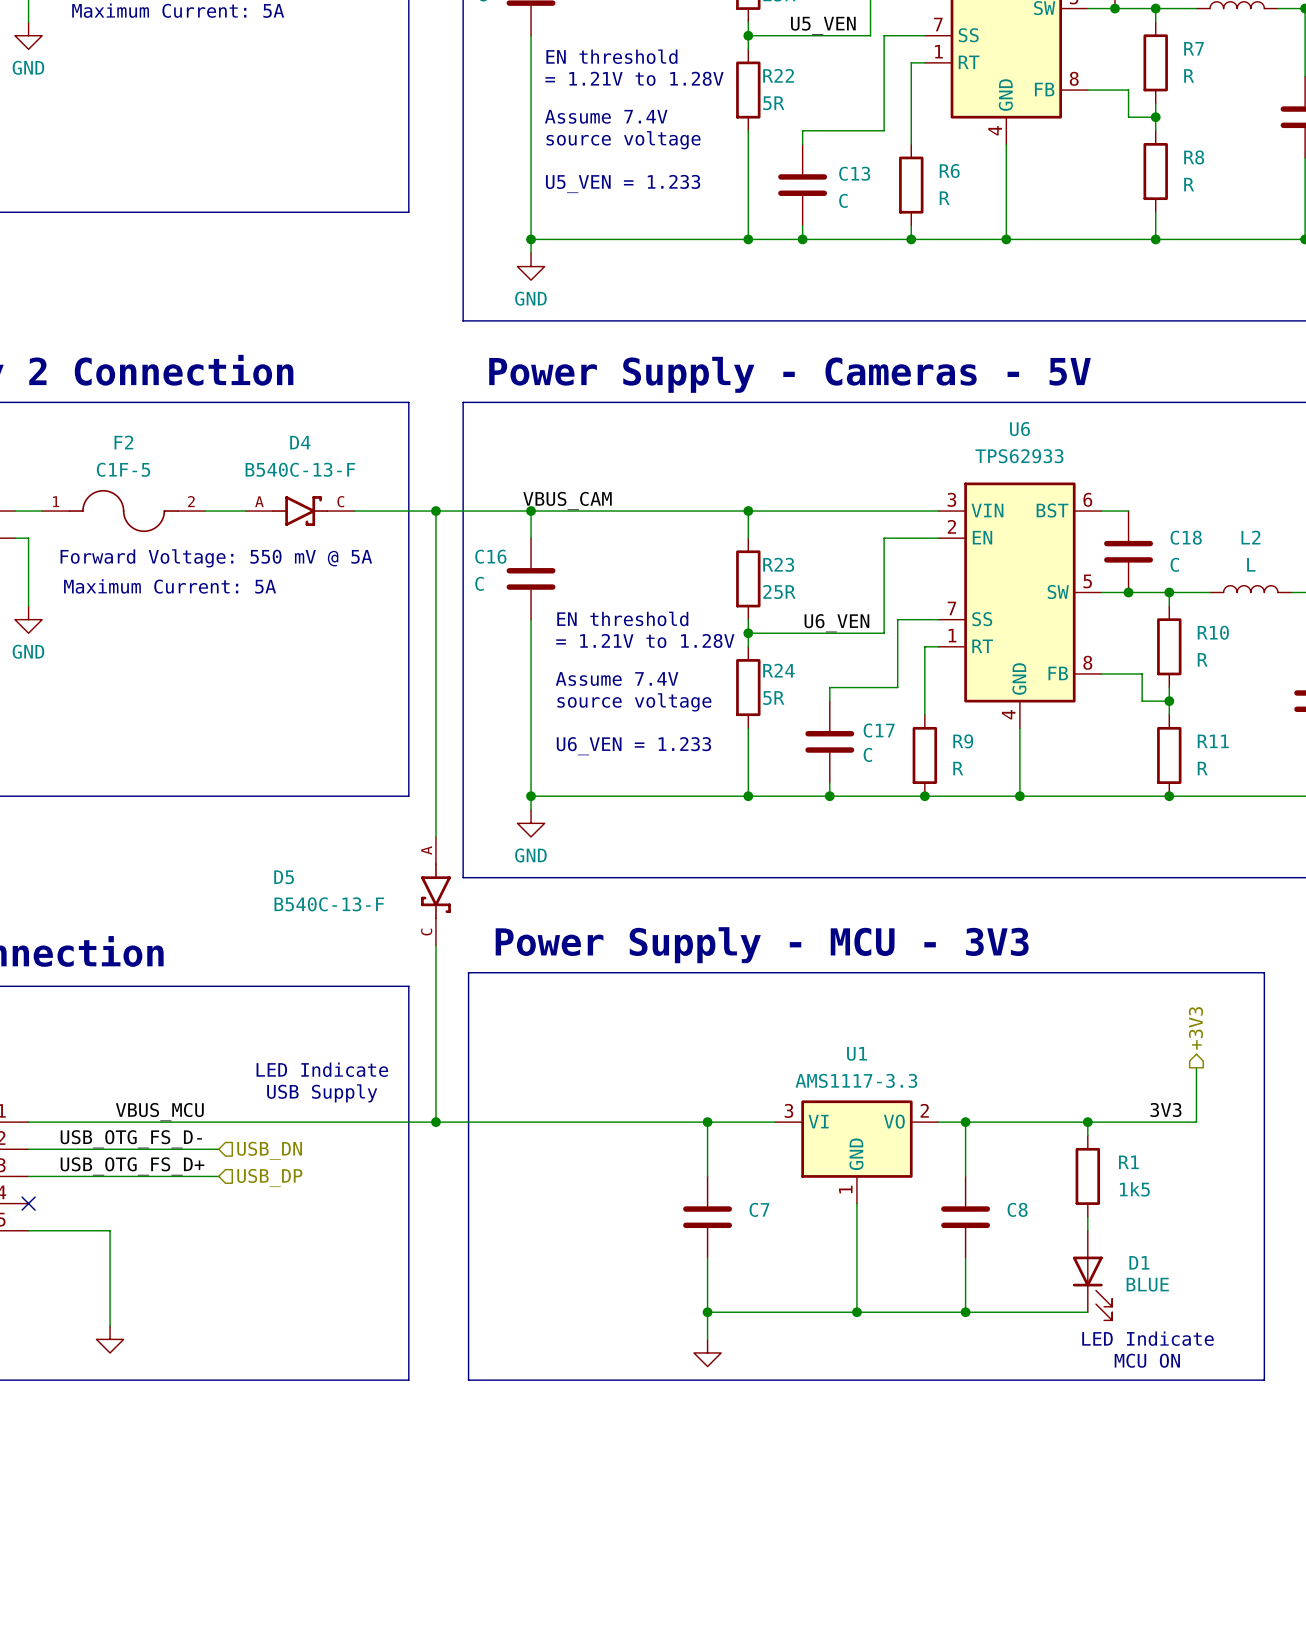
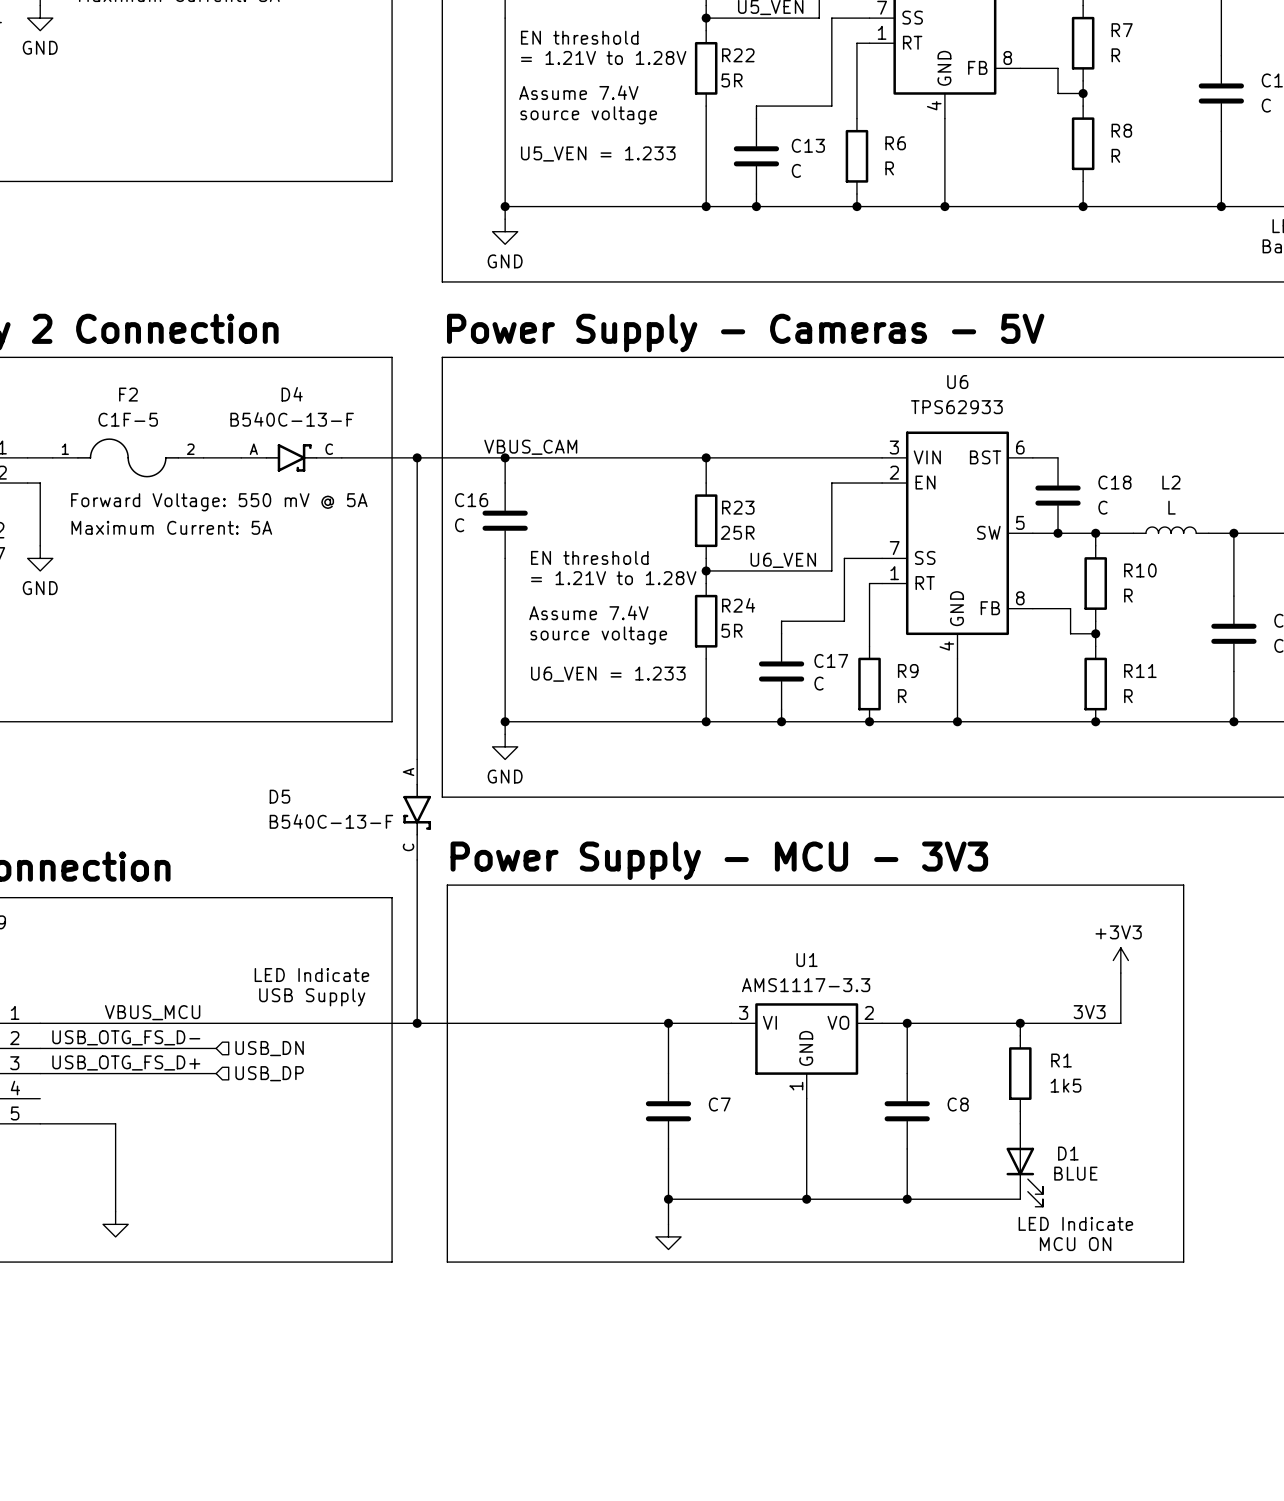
hierarchical label: +3V3 (1195, 1028) -> none
power symbol: none -> +3V3 (1120, 960)
no-connect mark: (28, 1203) -> none

